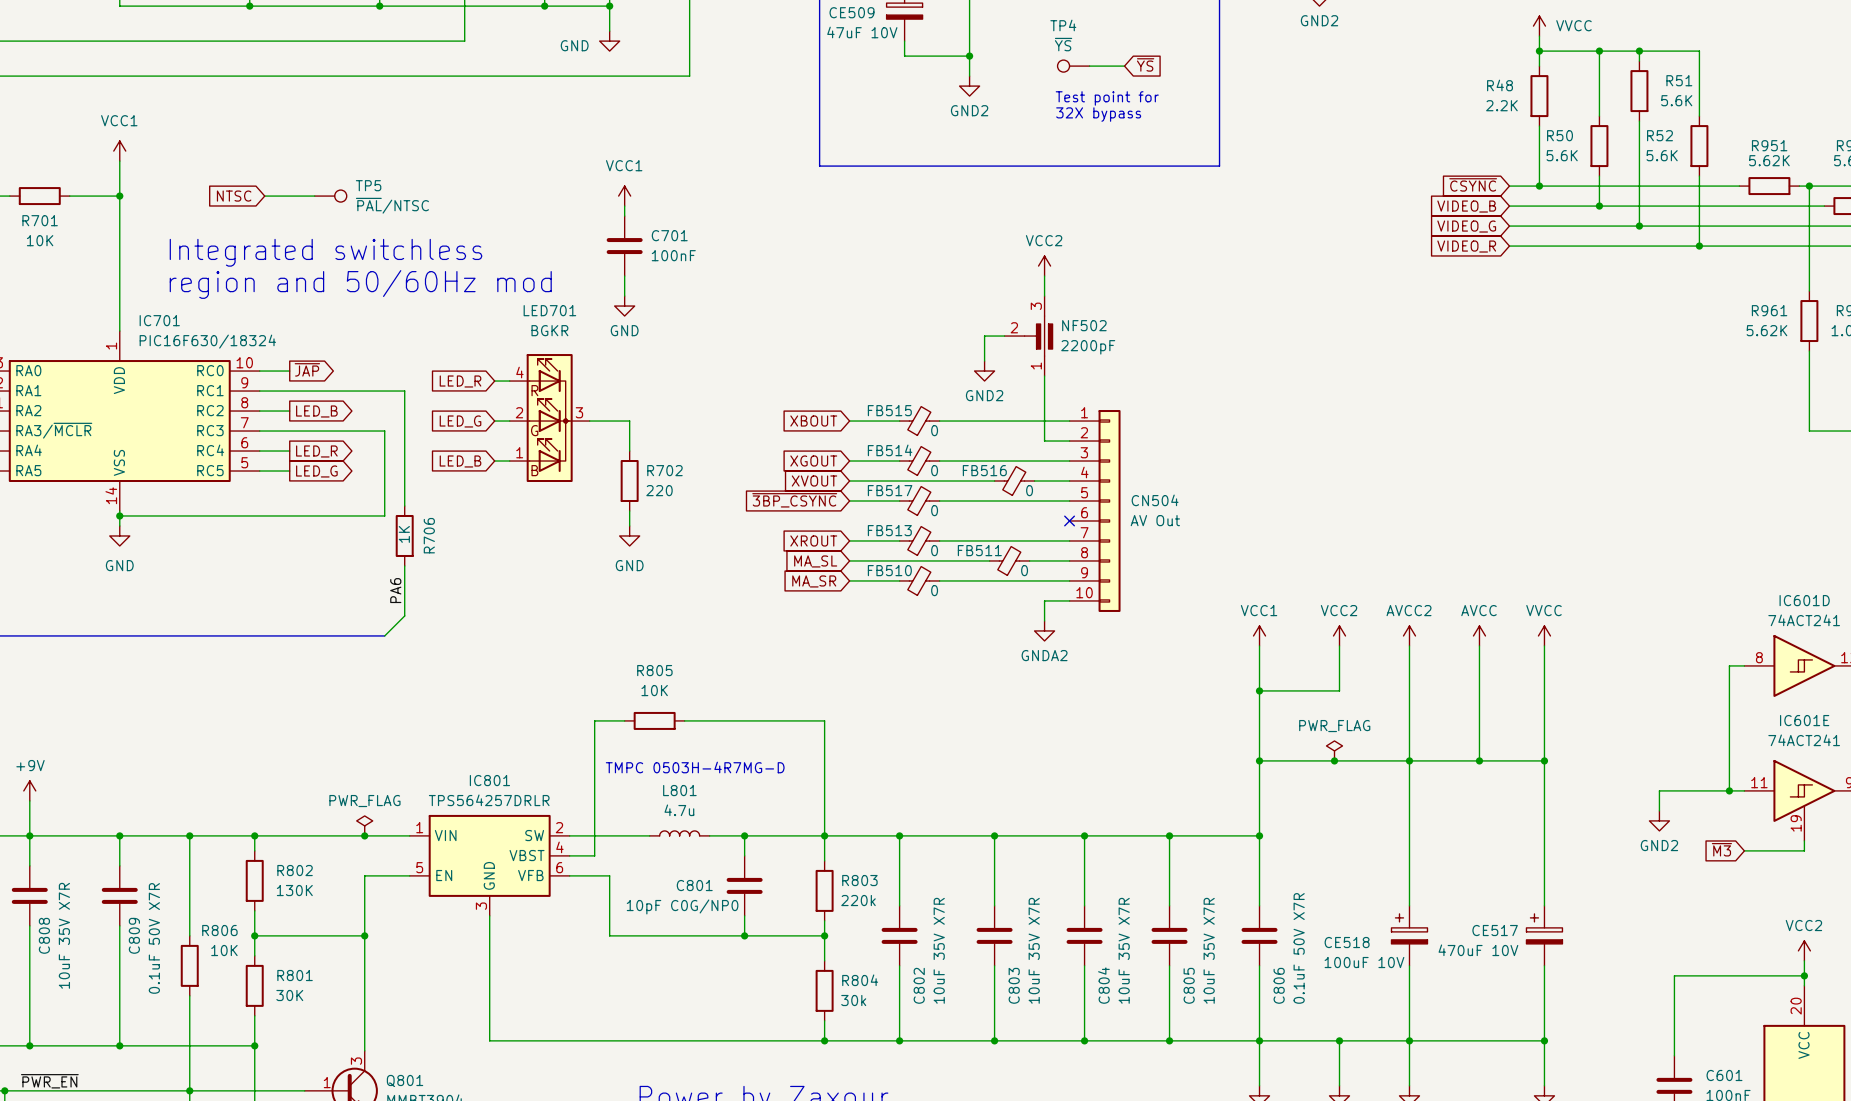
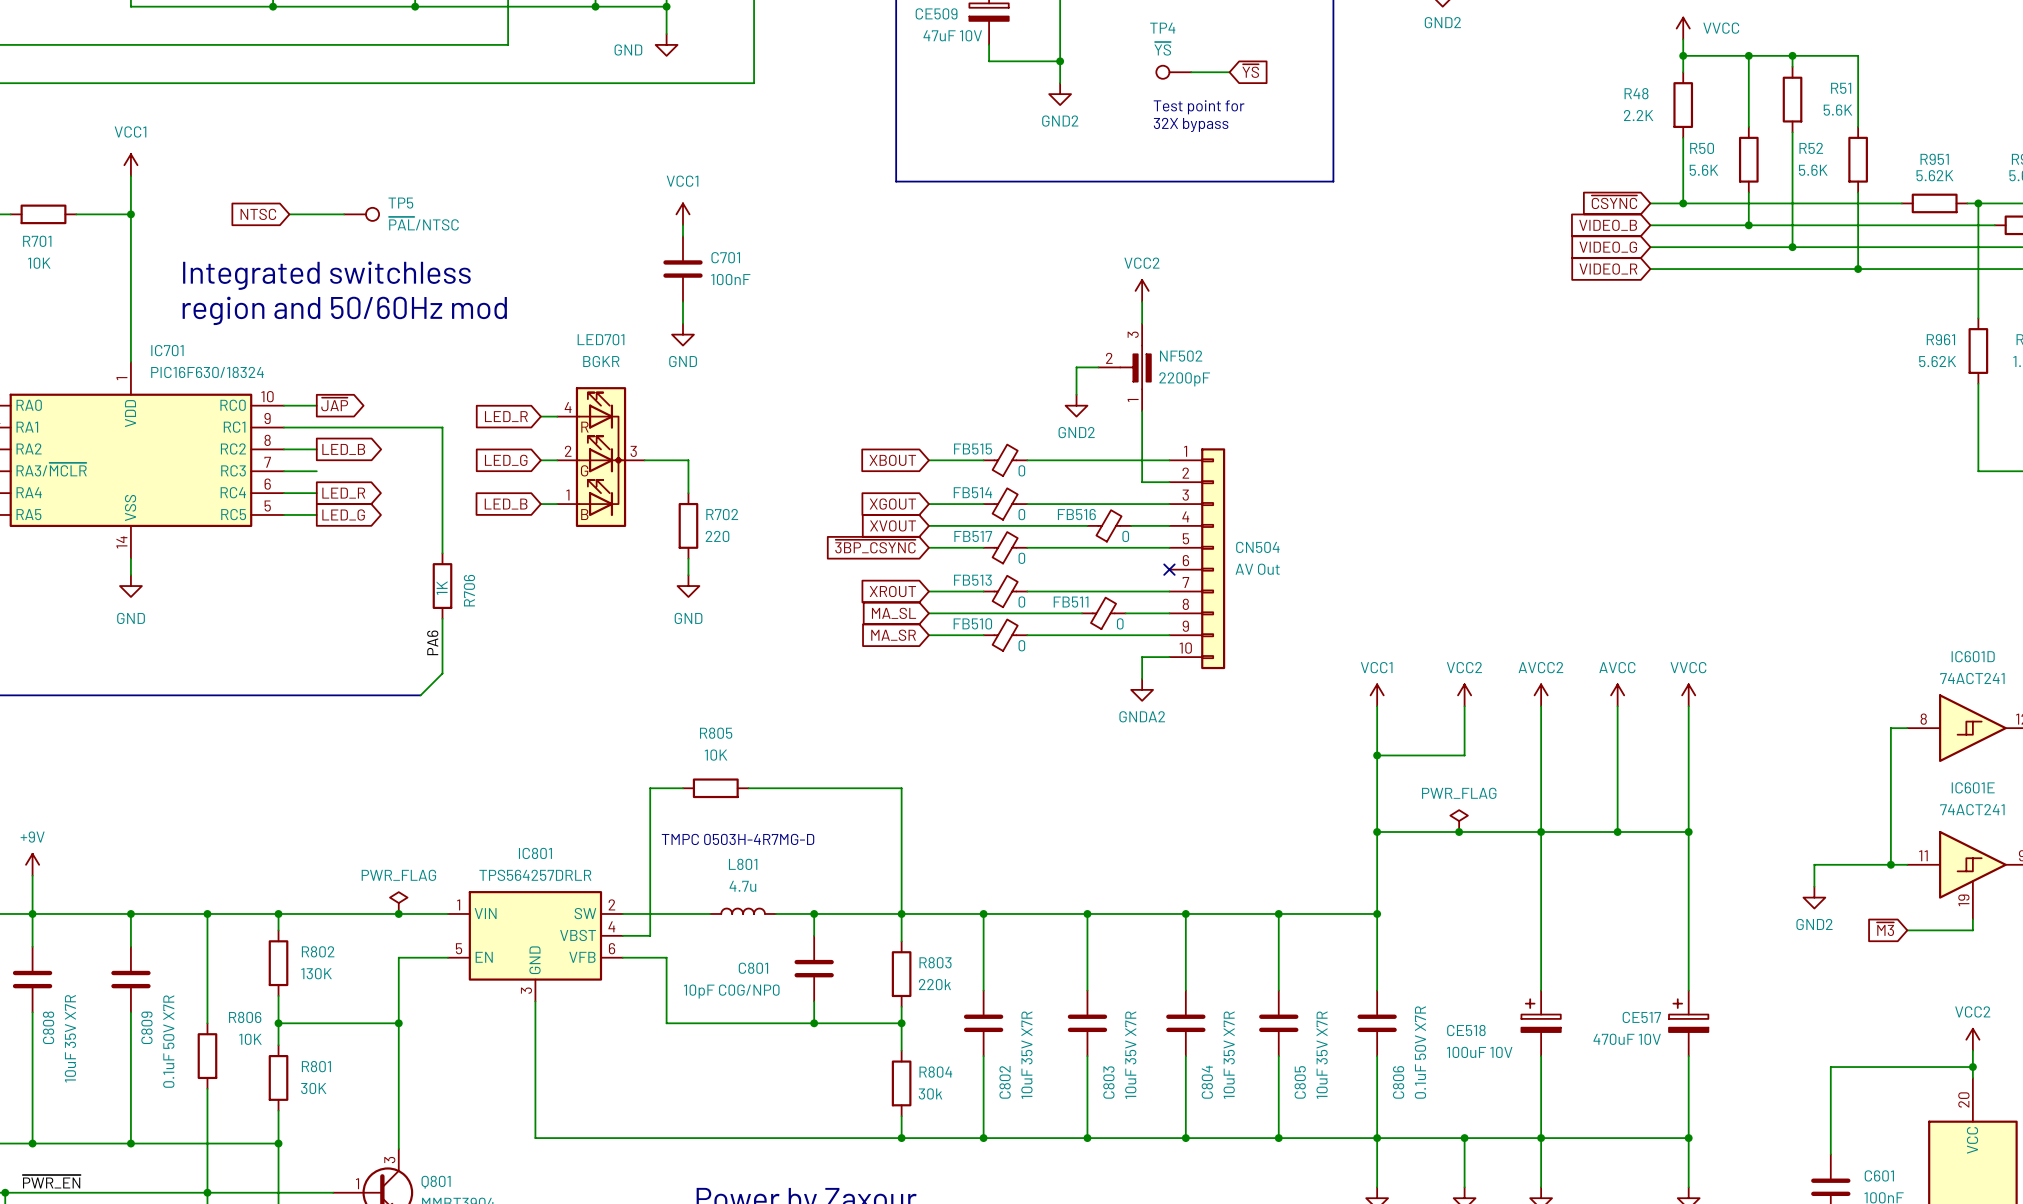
wire: (289, 431) (384, 431) (384, 515) (119, 515) -> none
junction: (119, 515) -> none

